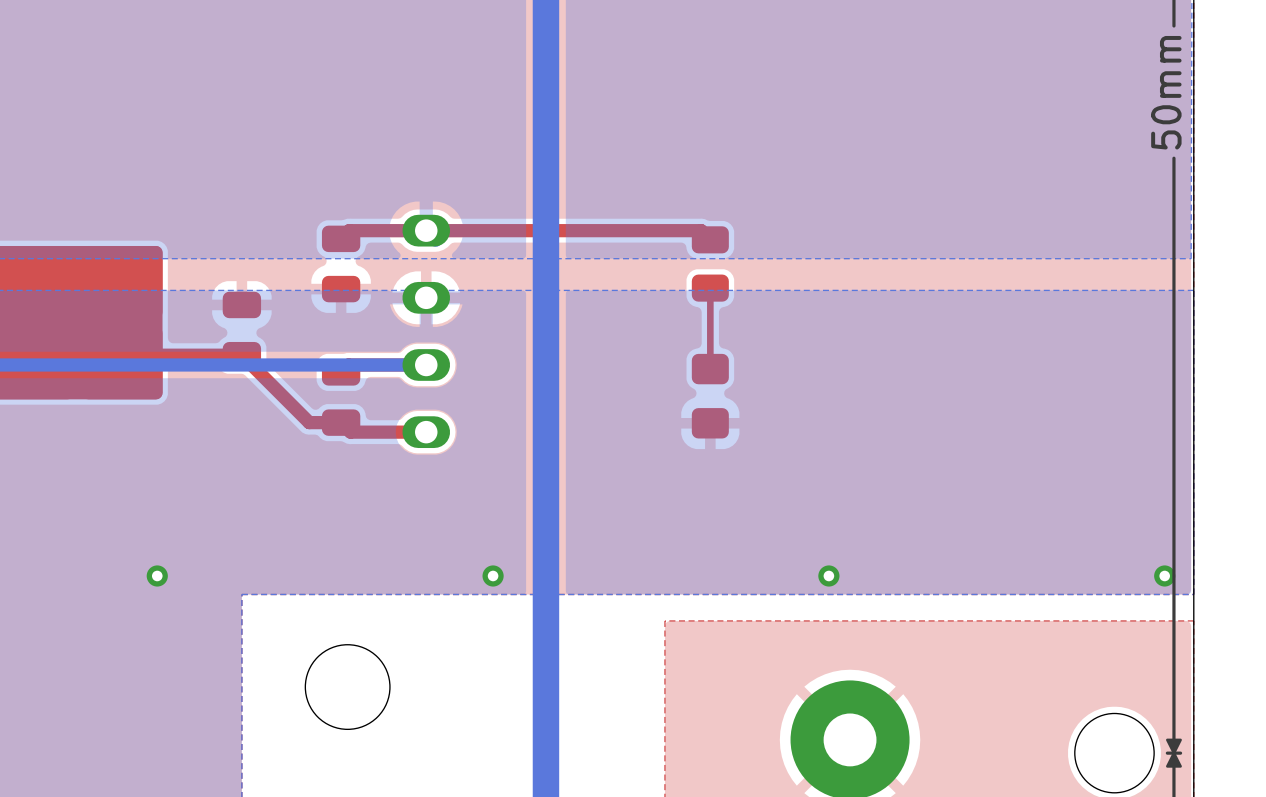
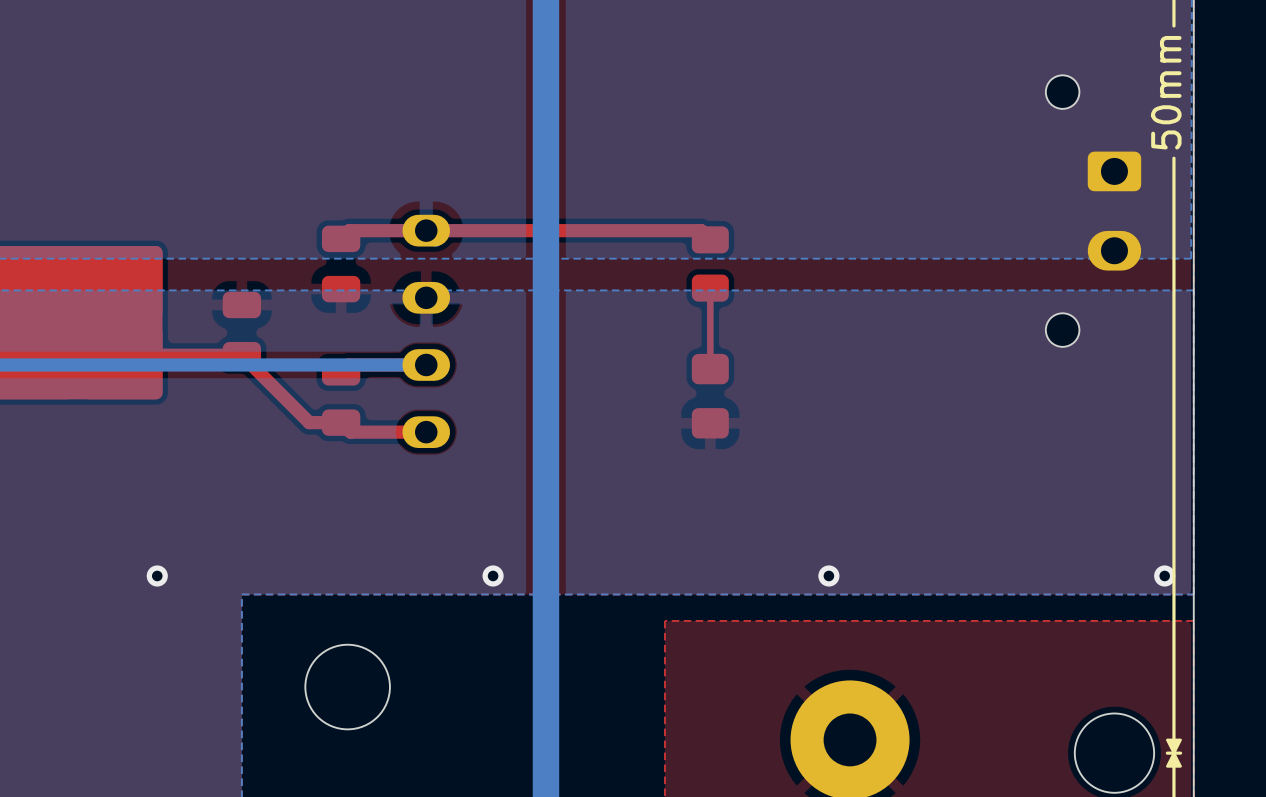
part: none -> (1093, 211)

